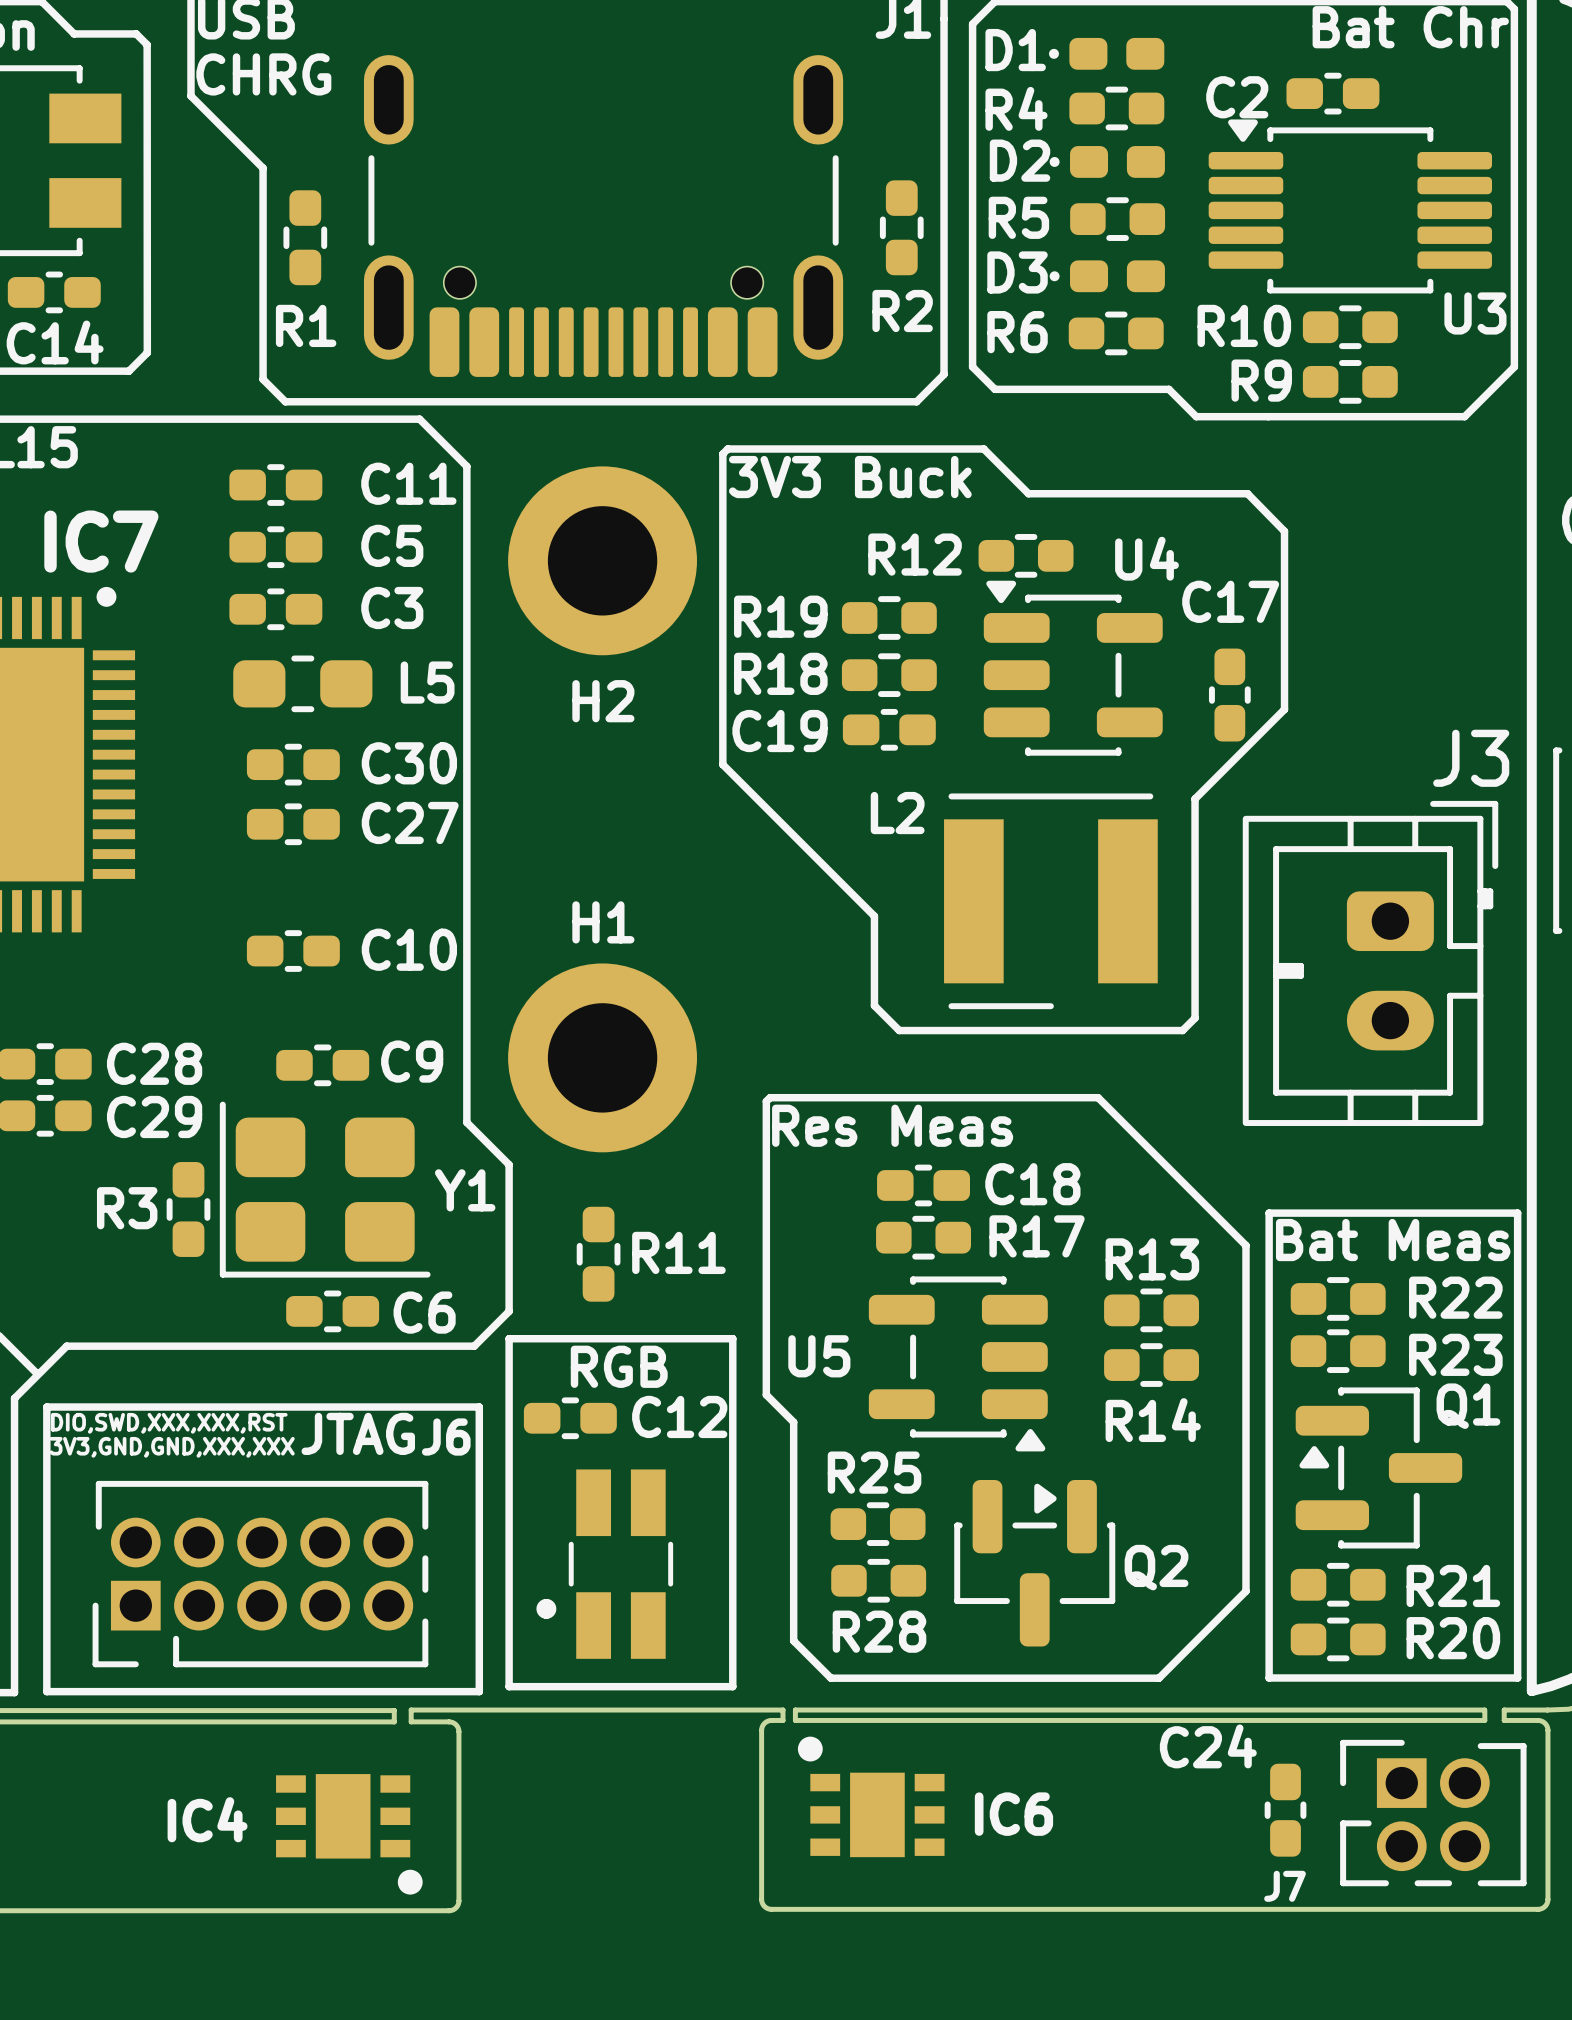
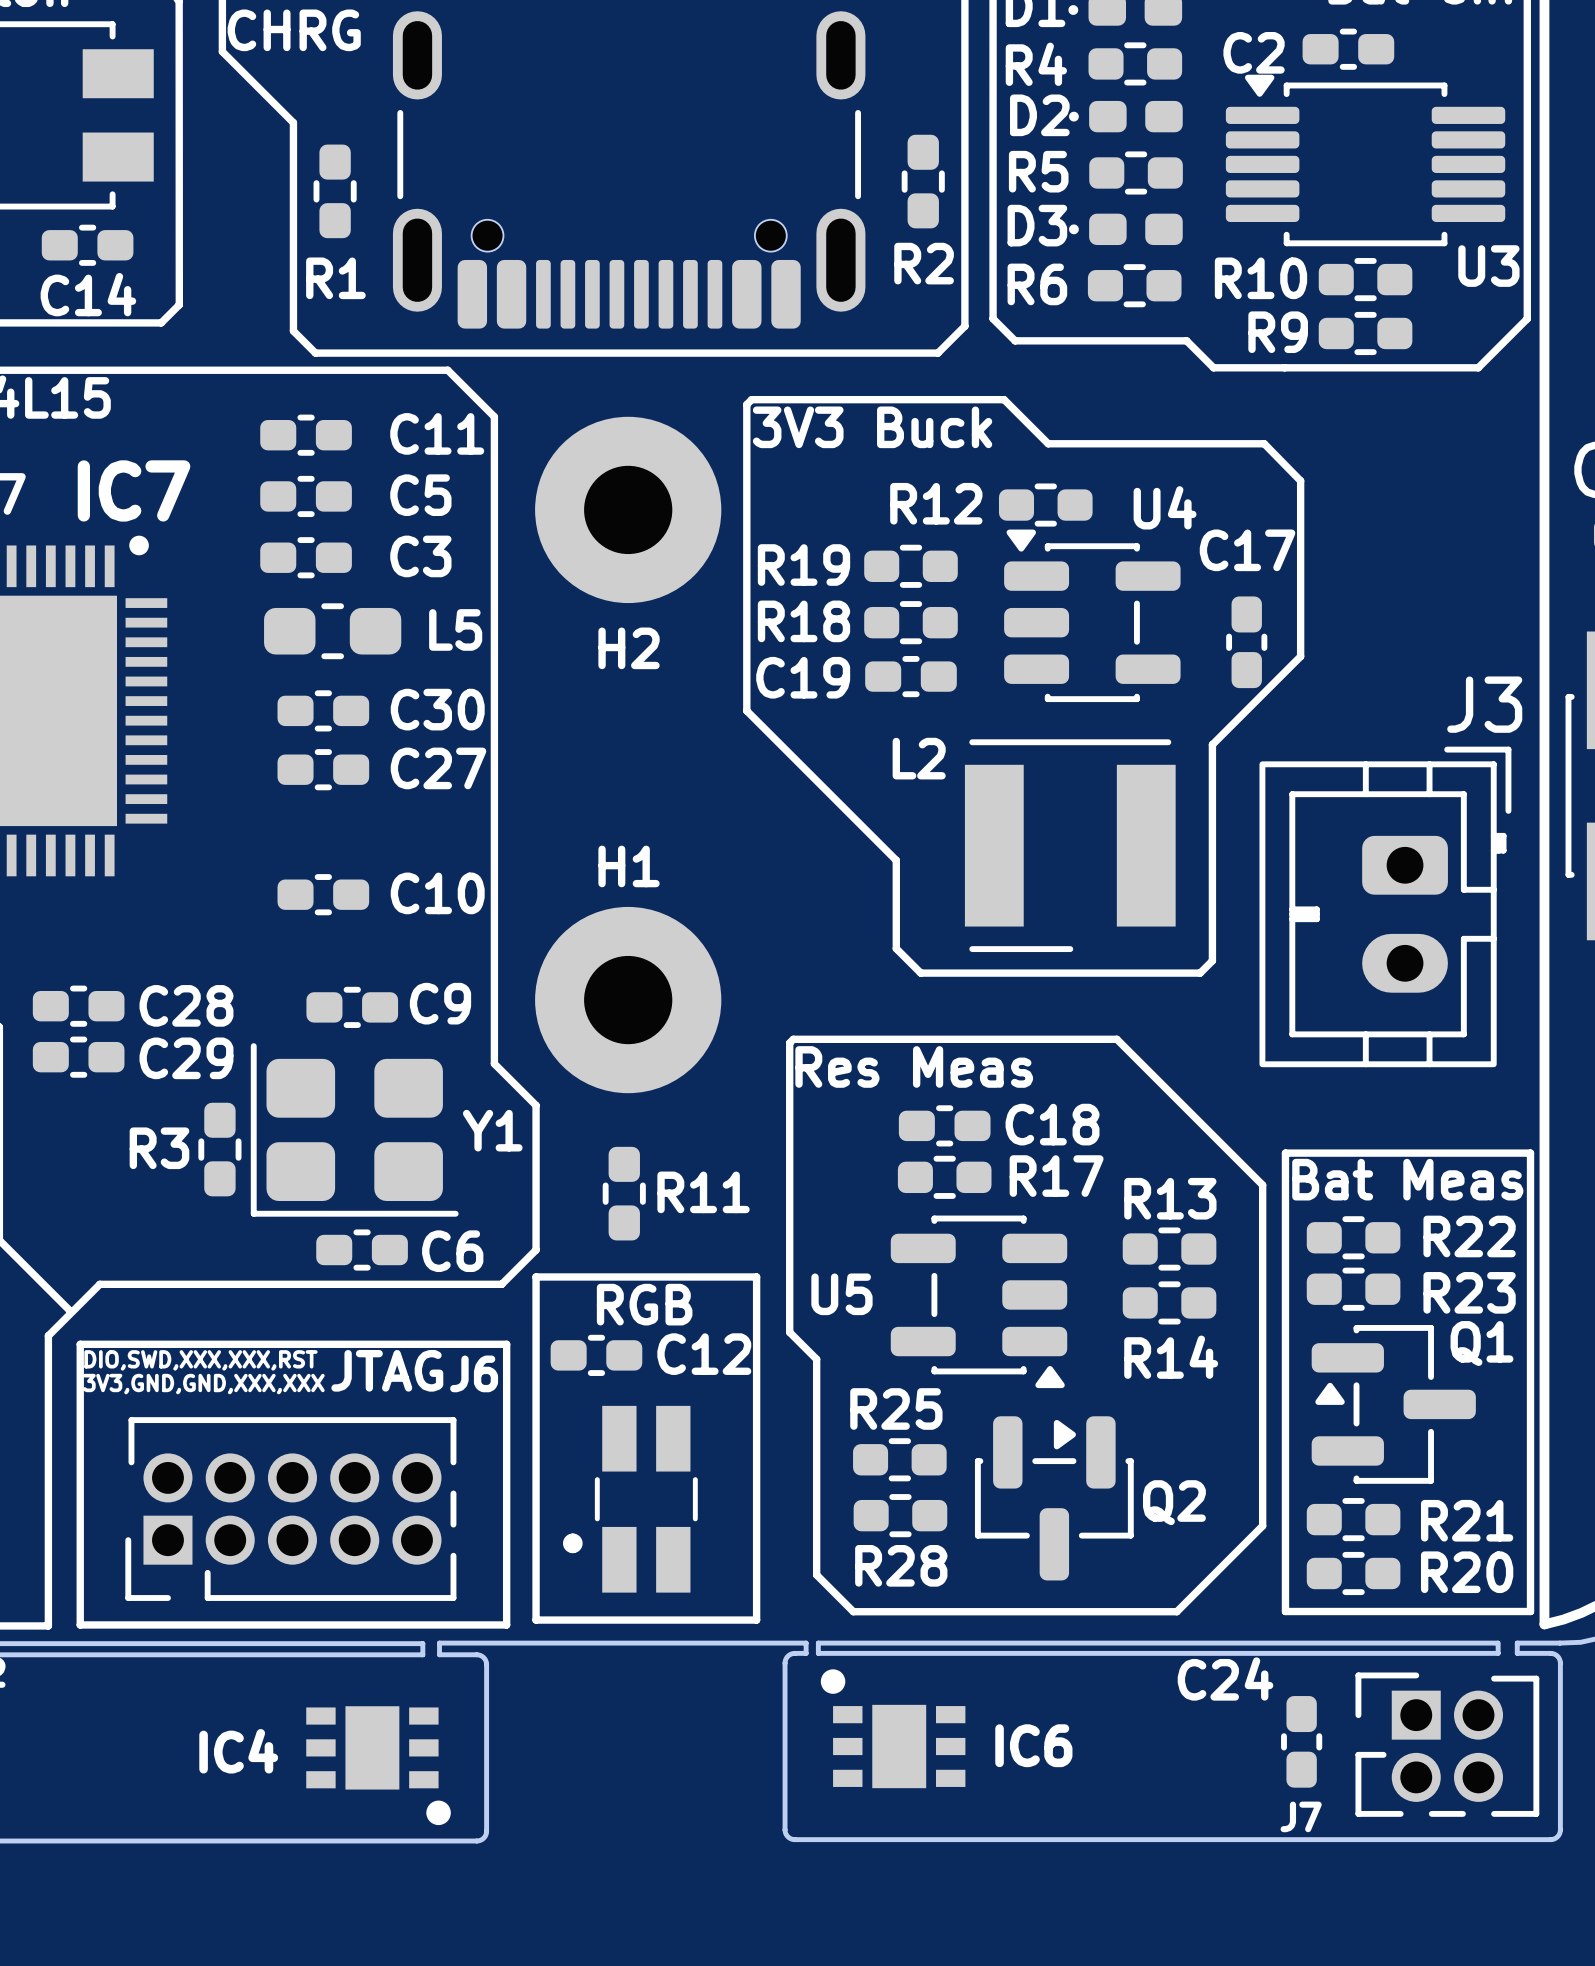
H2 footprint: [508, 466, 697, 656] -> [535, 416, 722, 604]
H1 footprint: [508, 963, 697, 1153] -> [535, 906, 722, 1094]

